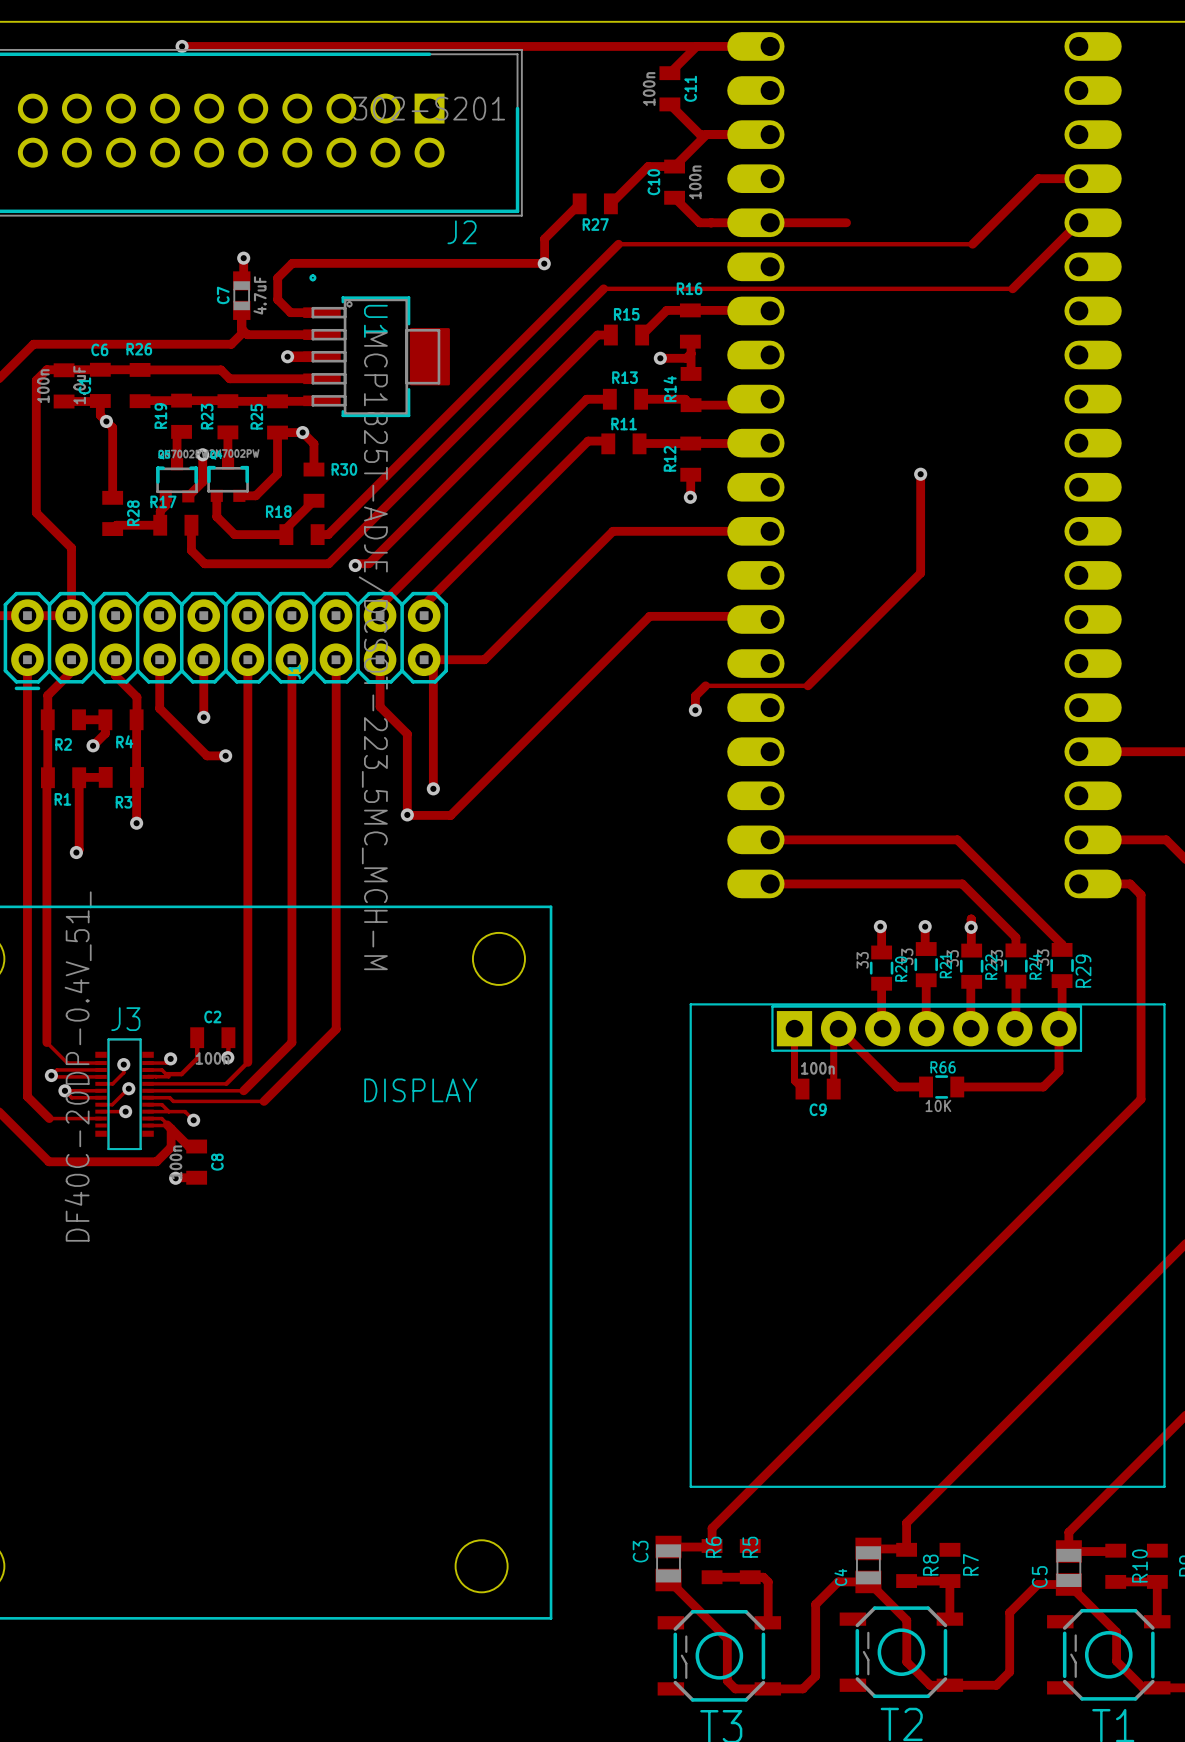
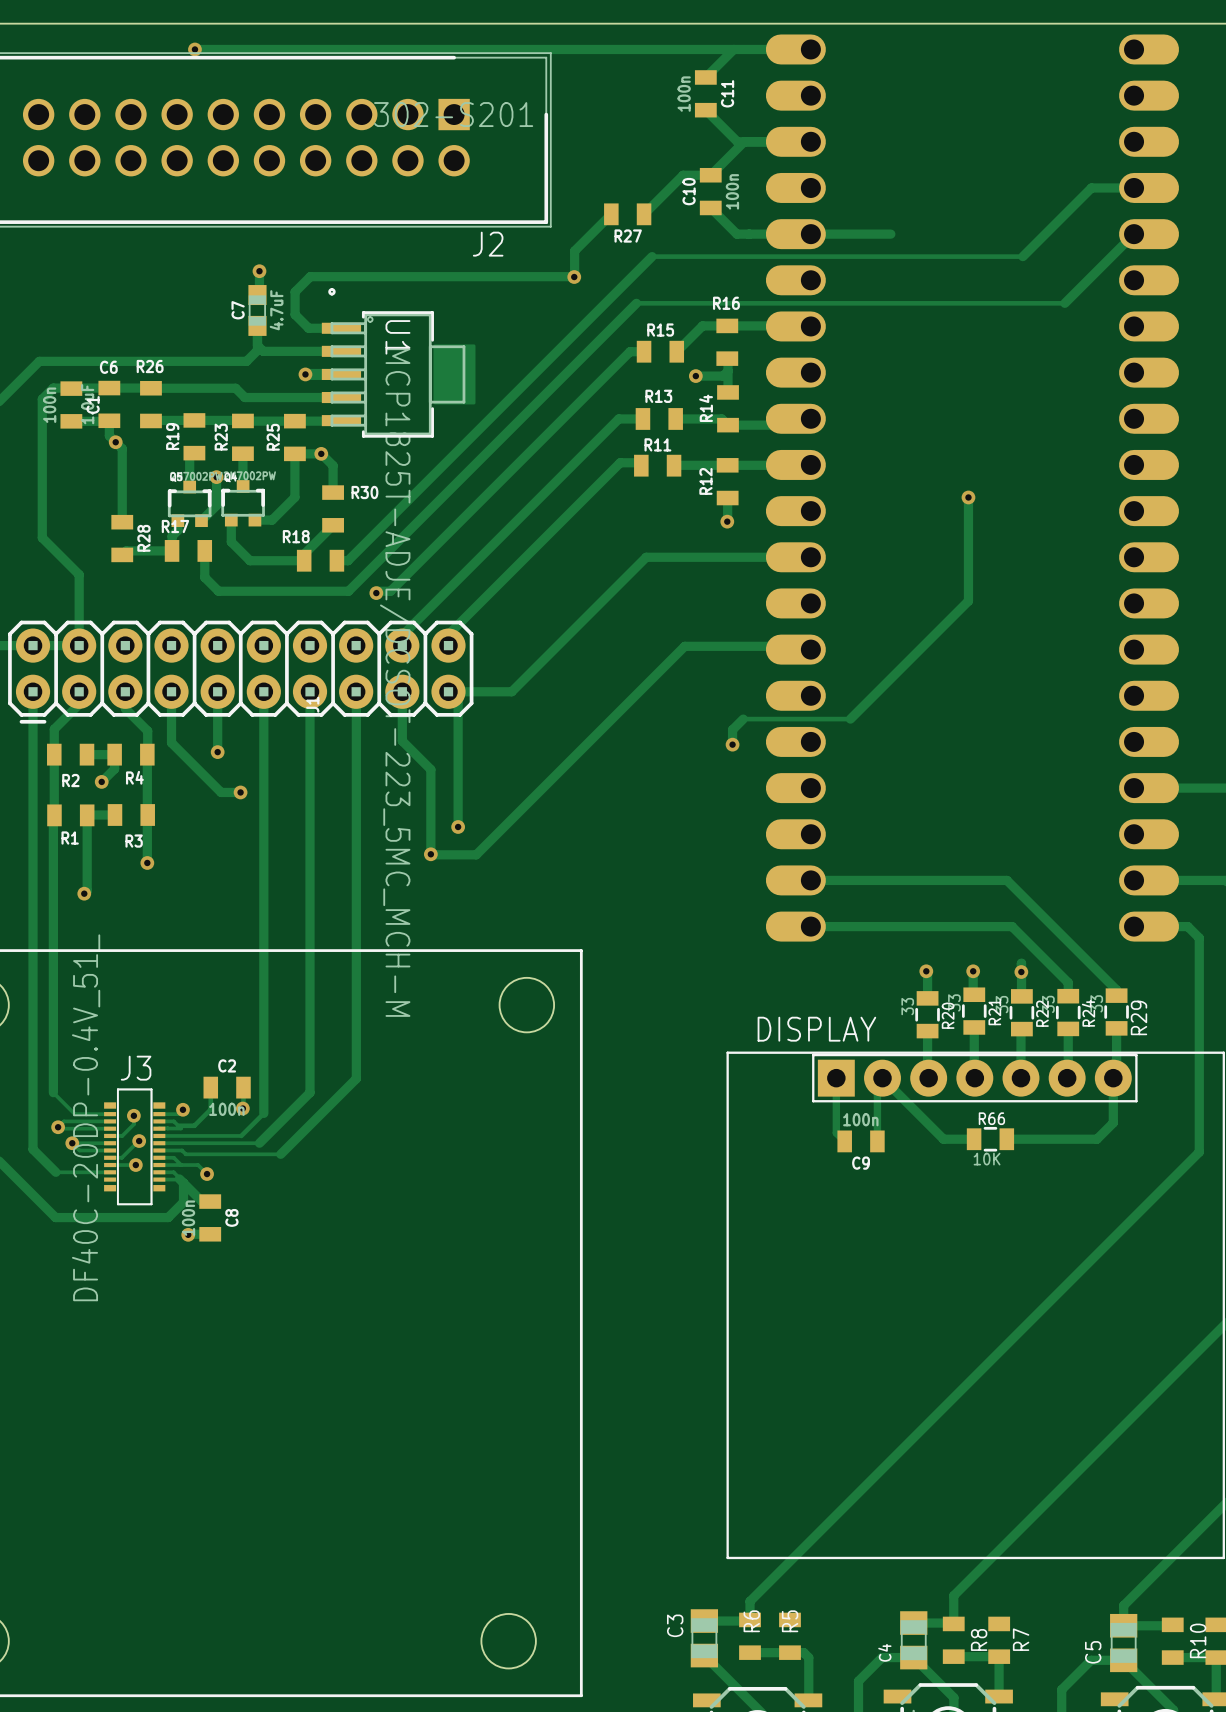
DISPLAY name position: DISPLAY (420, 1090) -> DISPLAY (816, 1029)

